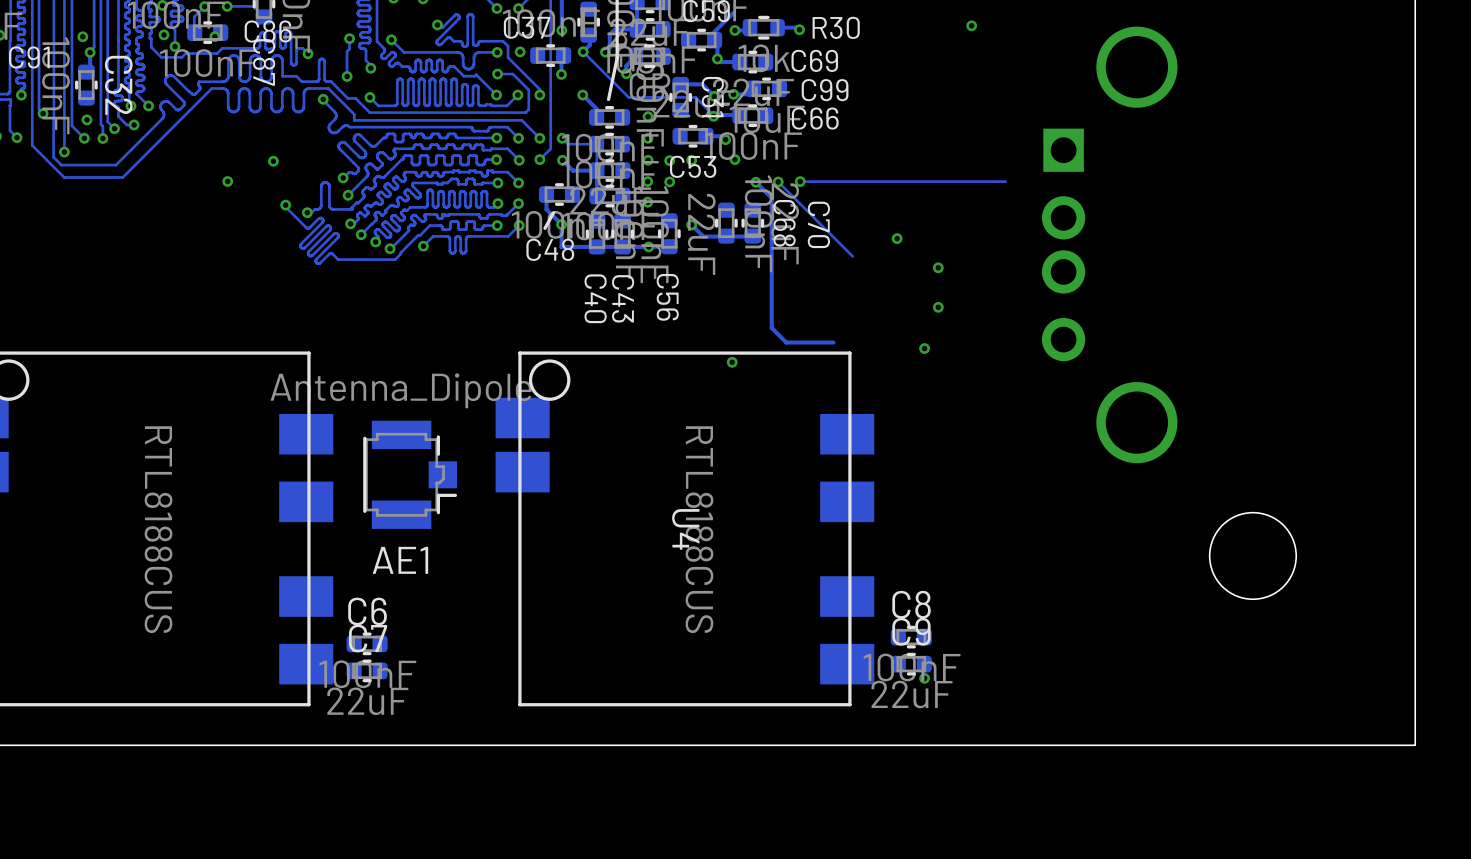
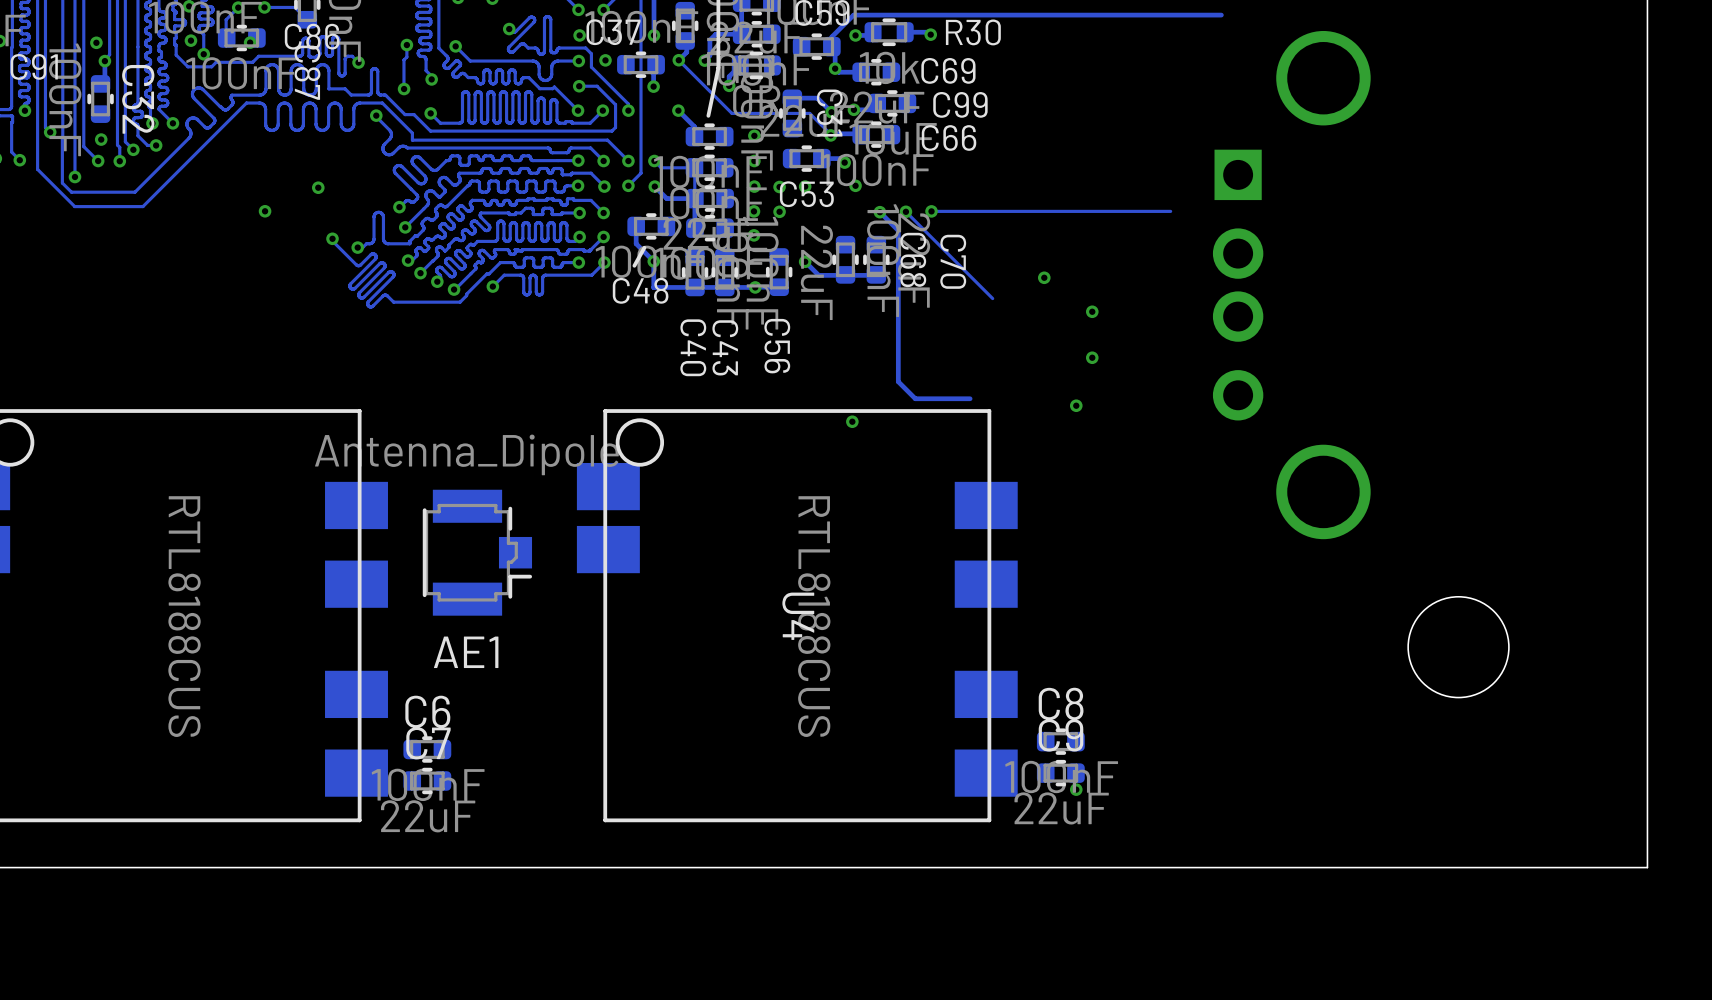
track: none -> (1221, 15) (853, 15)
via: (971, 25) -> none
via: none -> (579, 35)

